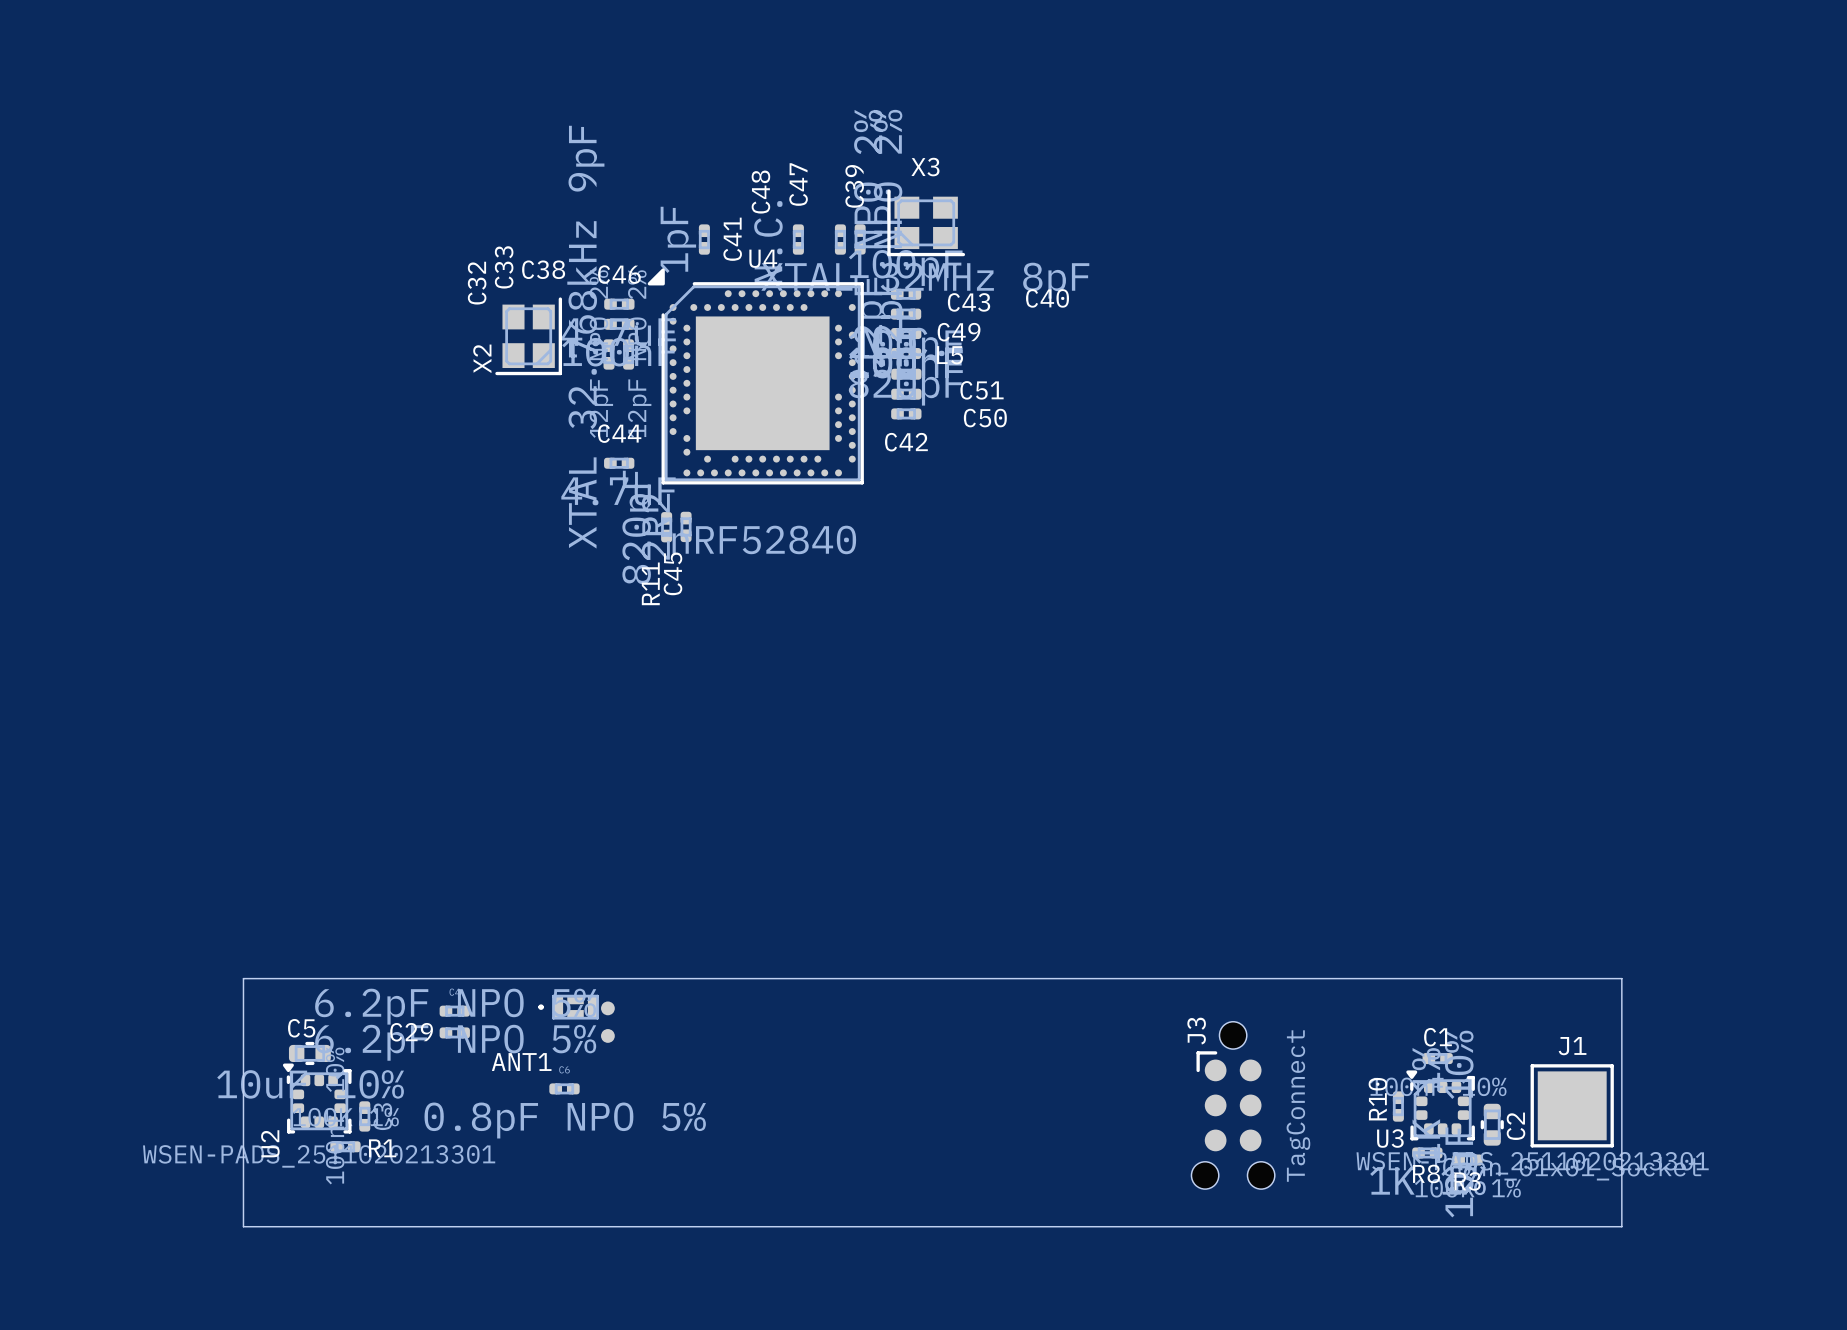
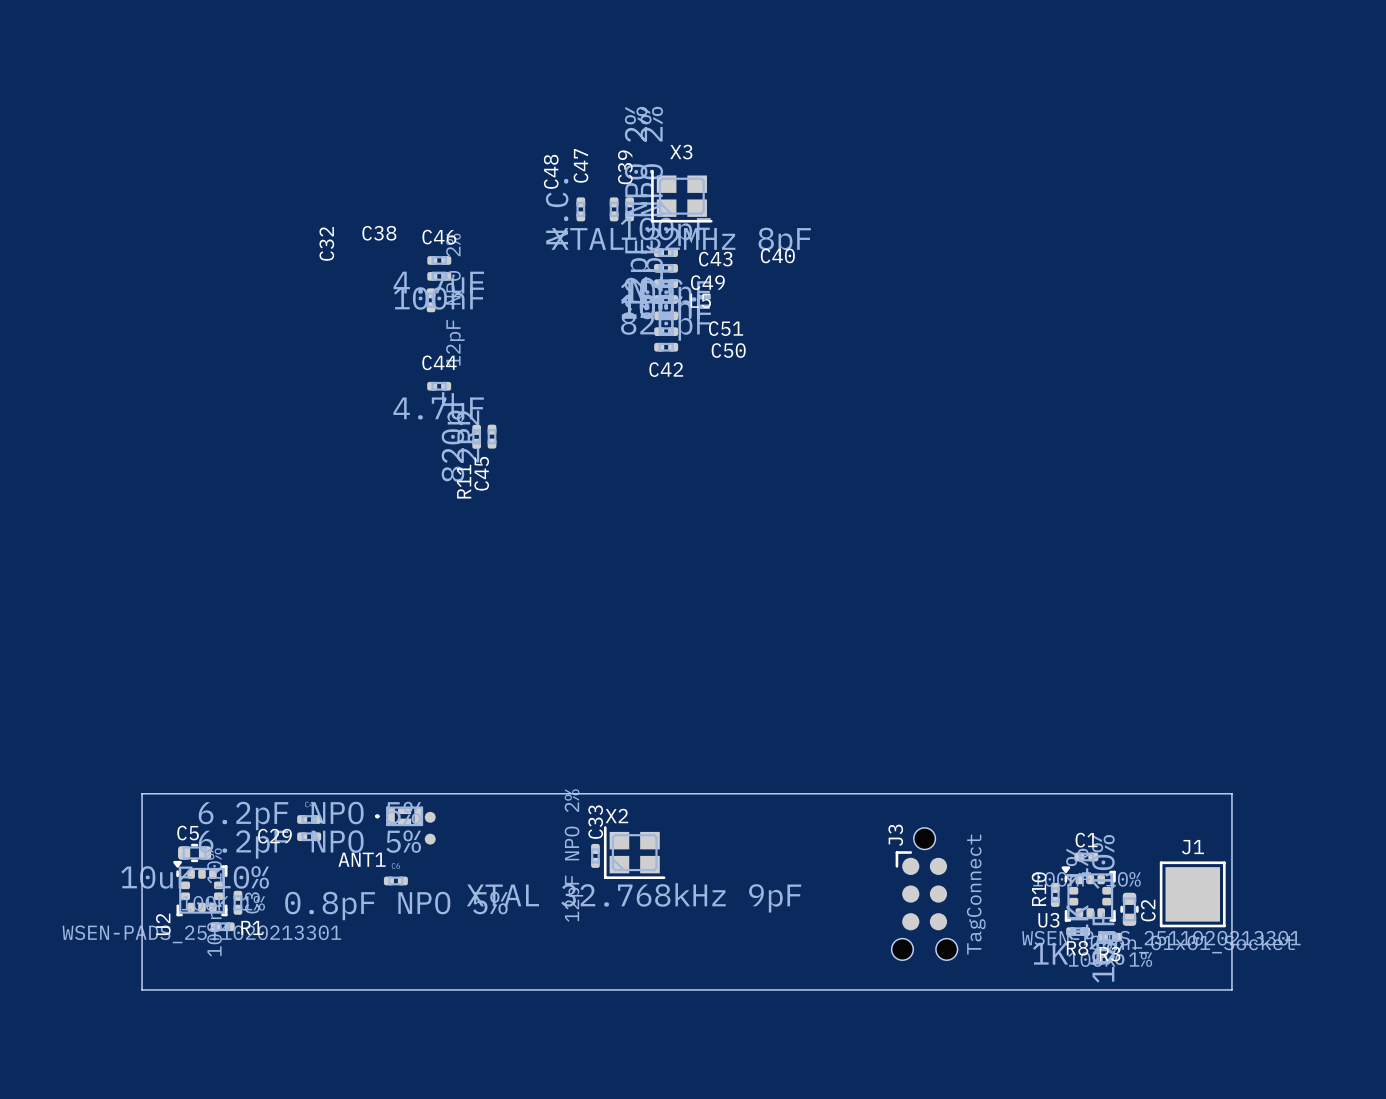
C41: 1pF (704, 239) -> none
C33 name position: C33 (504, 267) -> C33 (595, 822)
X2 rotation: 0° (528, 336) -> 90° clockwise (634, 852)
X2 position: (528, 336) -> (634, 852)
C33 position: (628, 354) -> (595, 855)
U4: nRF52840 (755, 376) -> none

